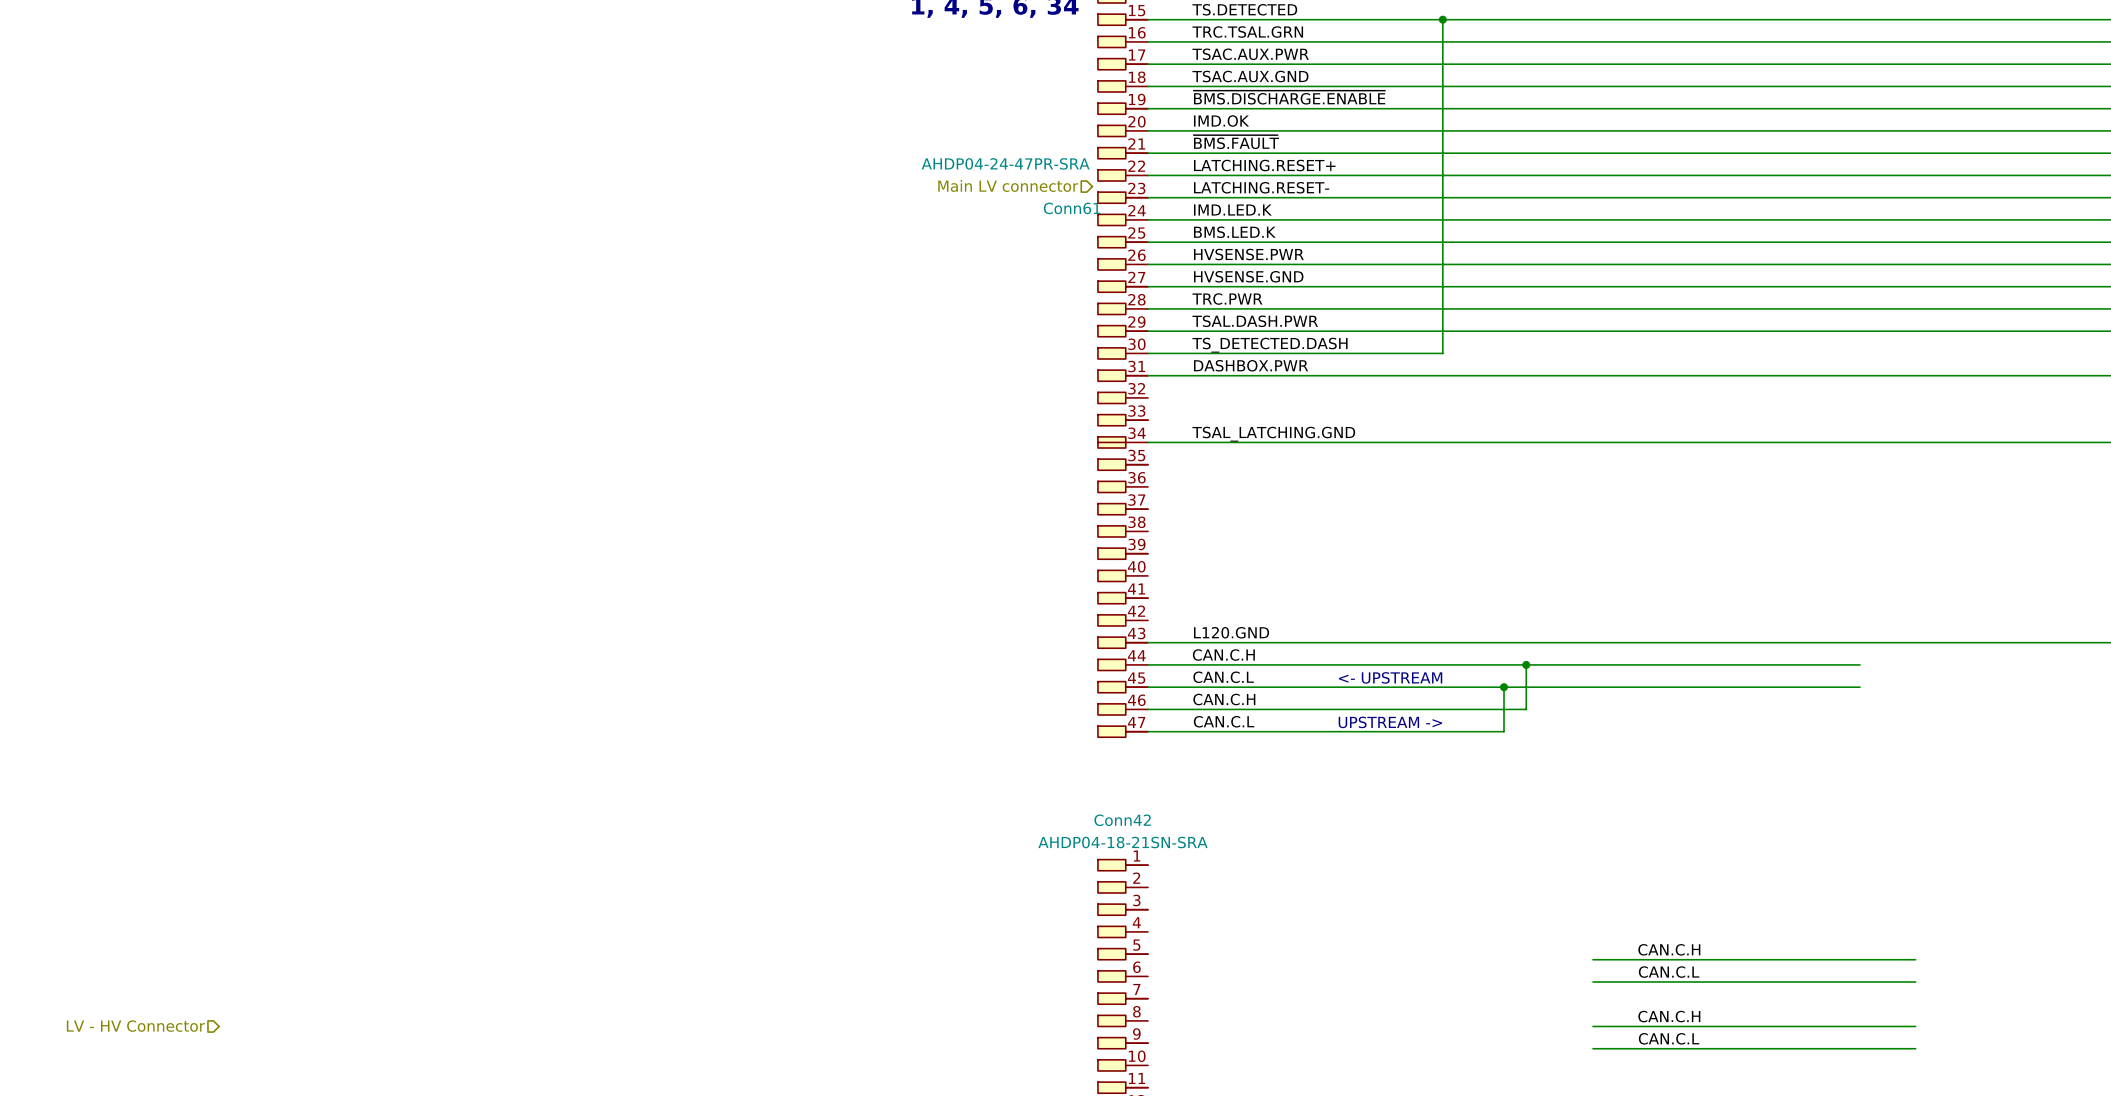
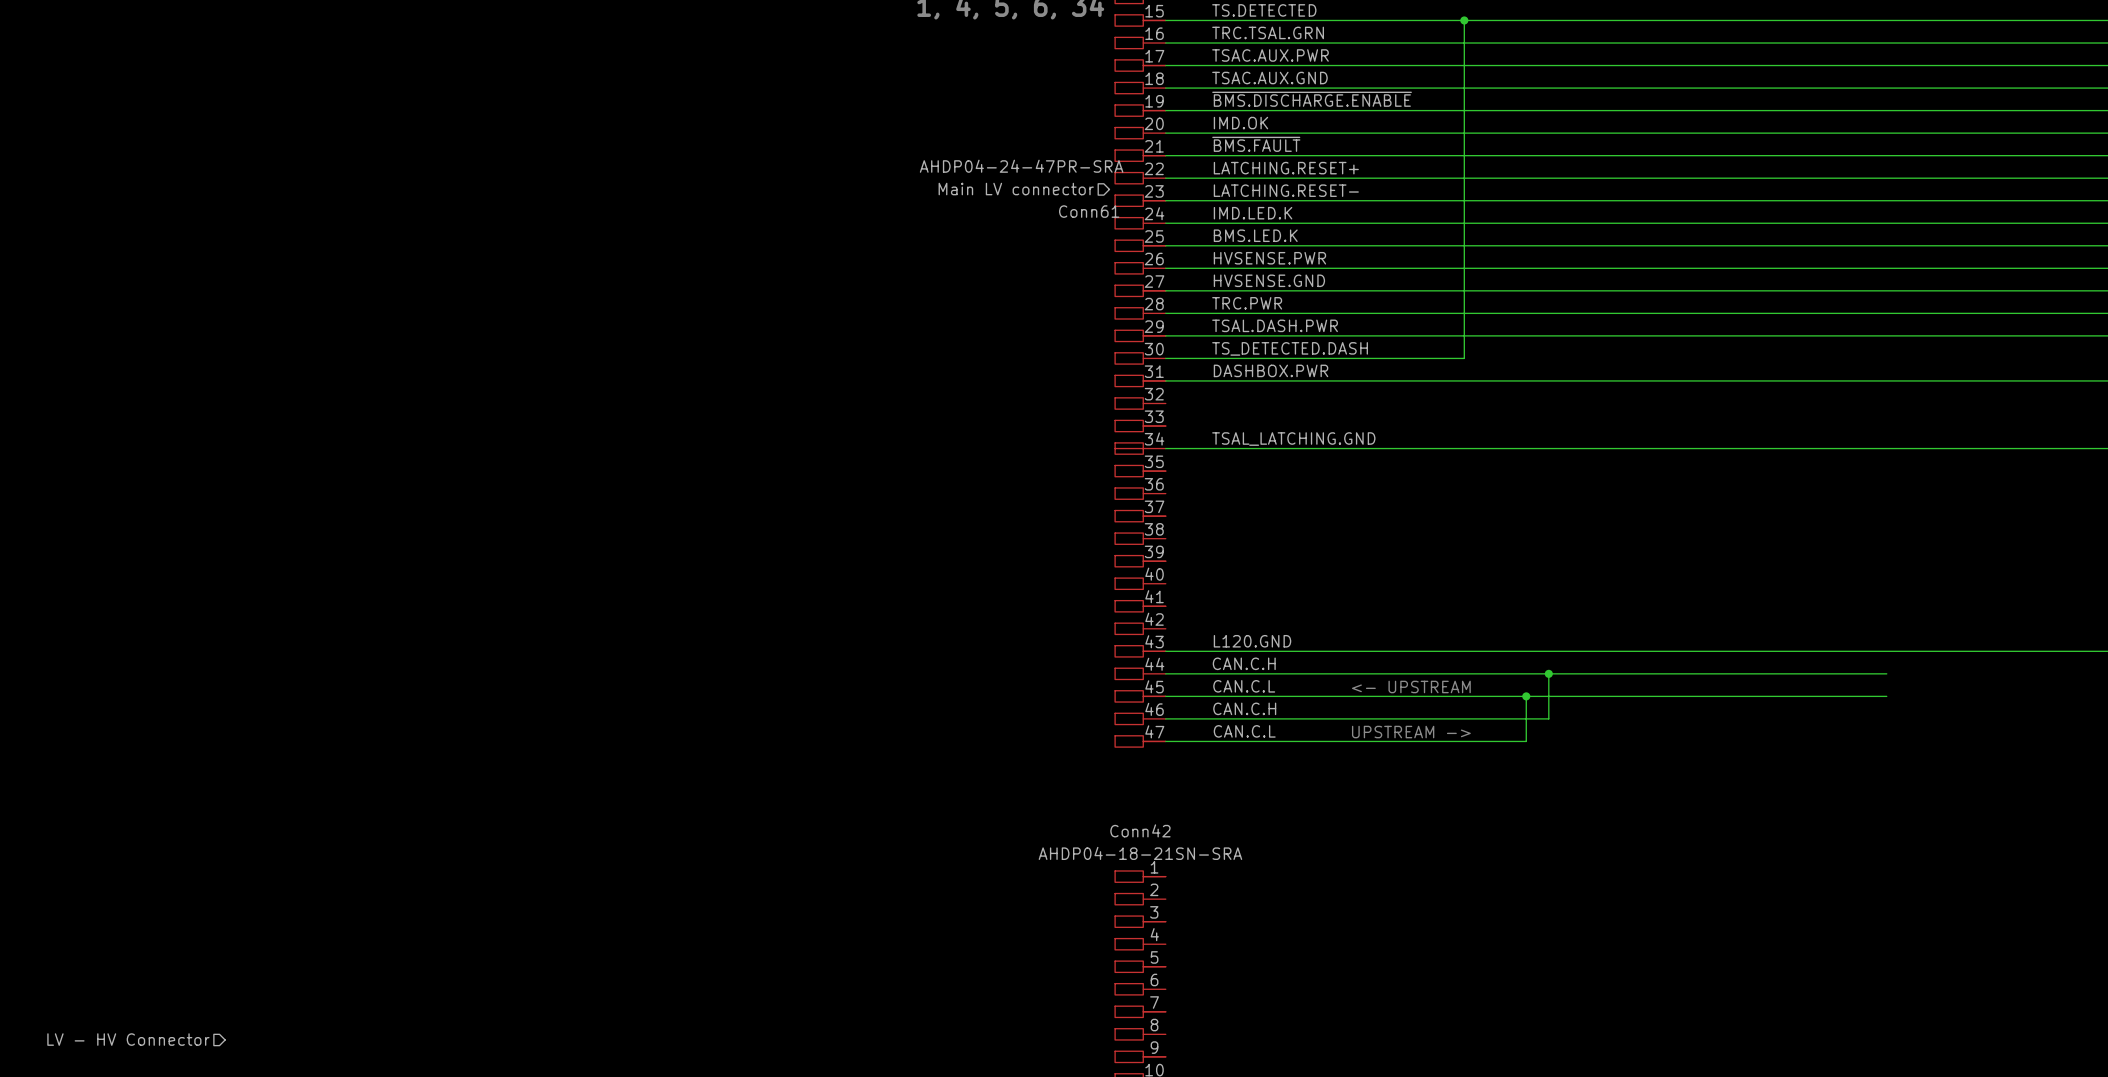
label: CAN.C.H (1669, 949) -> none
wire: (1593, 959) (1915, 959) -> none
label: CAN.C.L (1669, 972) -> none
wire: (1593, 981) (1915, 981) -> none
label: CAN.C.H (1669, 1016) -> none
wire: (1593, 1026) (1915, 1026) -> none
label: CAN.C.L (1669, 1038) -> none
wire: (1593, 1048) (1915, 1048) -> none

